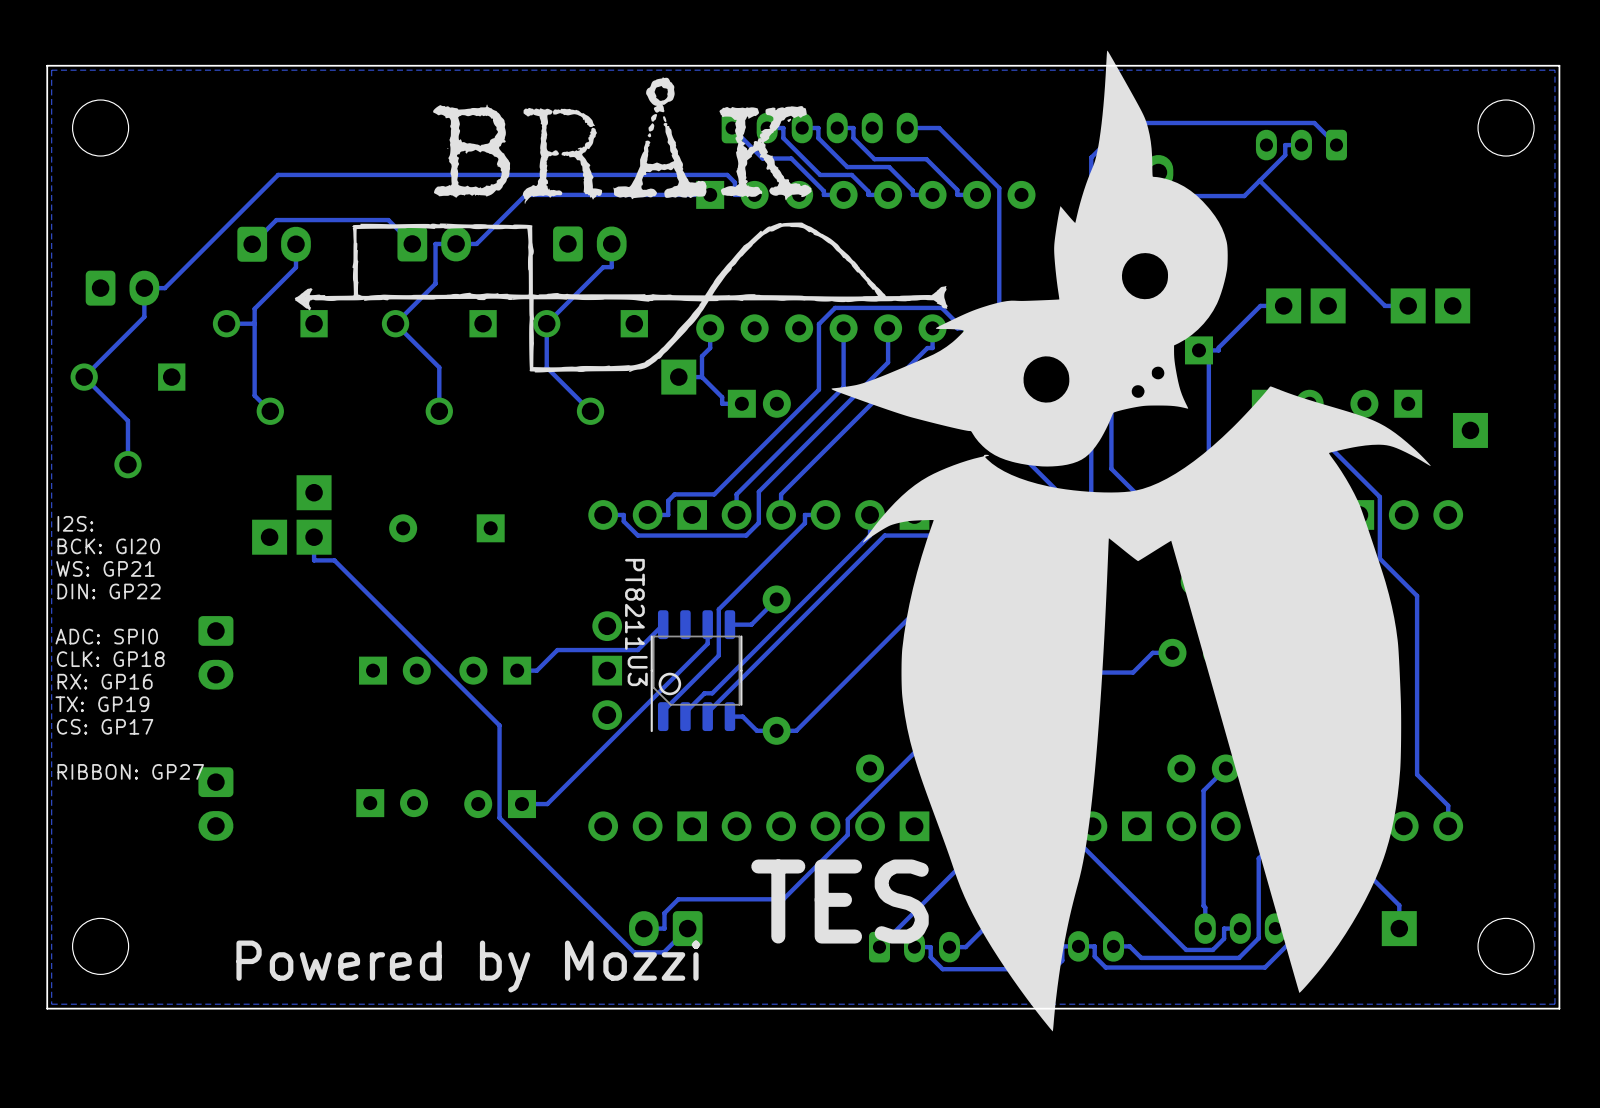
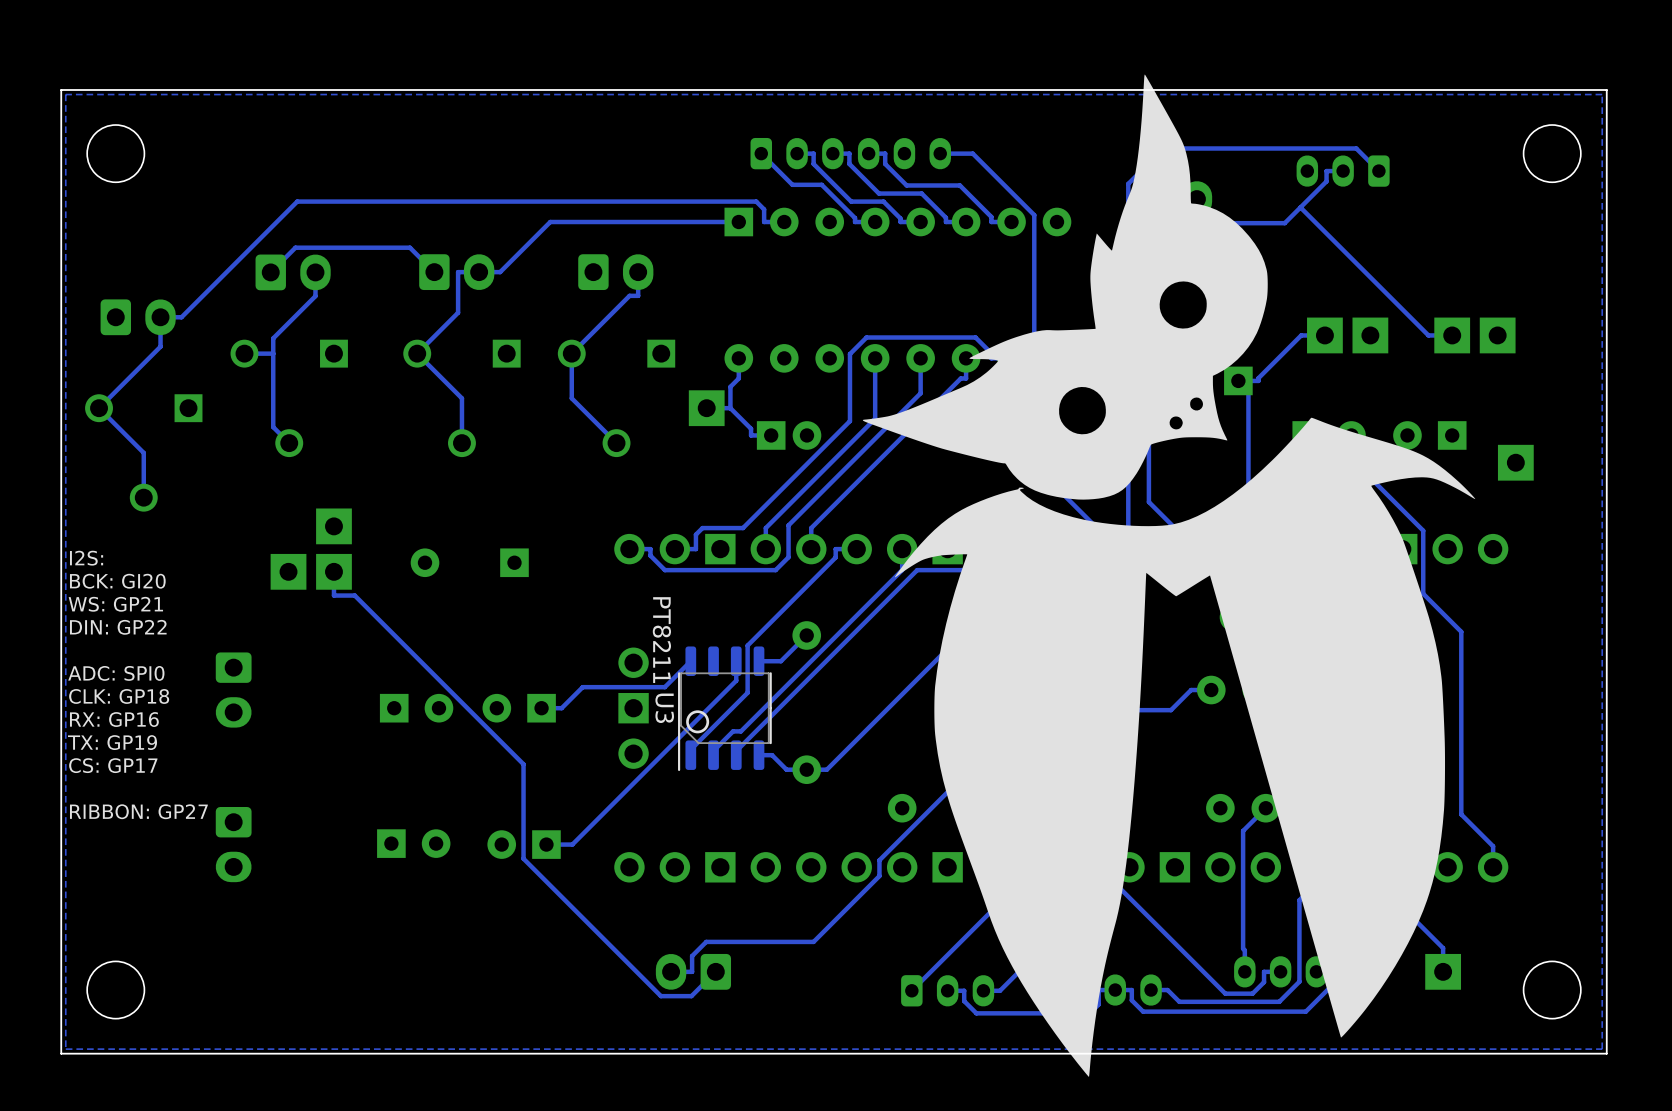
drawing: [294, 77, 948, 373] -> none
text: TES (840, 901) -> none
text: Powered by Mozzi (468, 966) -> none

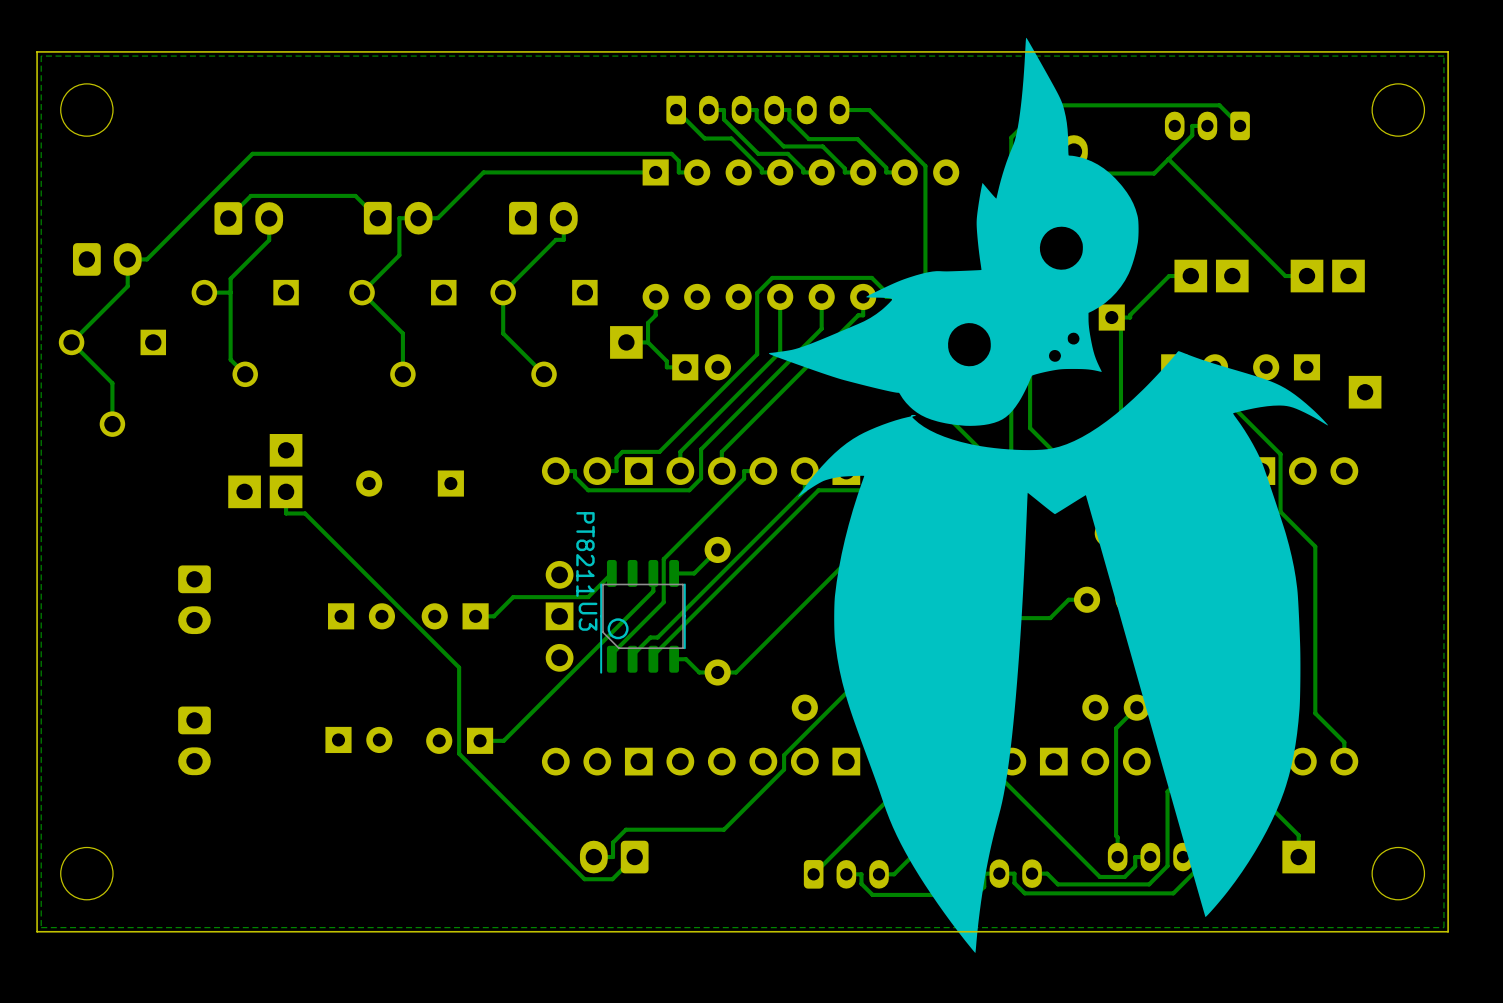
text: I2S: (86, 558) -> none
text: BCK: GI20 (117, 581) -> none
text: WS: GP21 (115, 604) -> none
text: DIN: GP22 (118, 627) -> none
text: ADC: SPI0 (116, 673) -> none
text: CLK: GP18 (119, 696) -> none
text: RX: GP16 (114, 719) -> none
text: TX: GP19 (112, 742) -> none
text: CS: GP17 (113, 765) -> none
text: RIBBON: GP27 (138, 811) -> none

